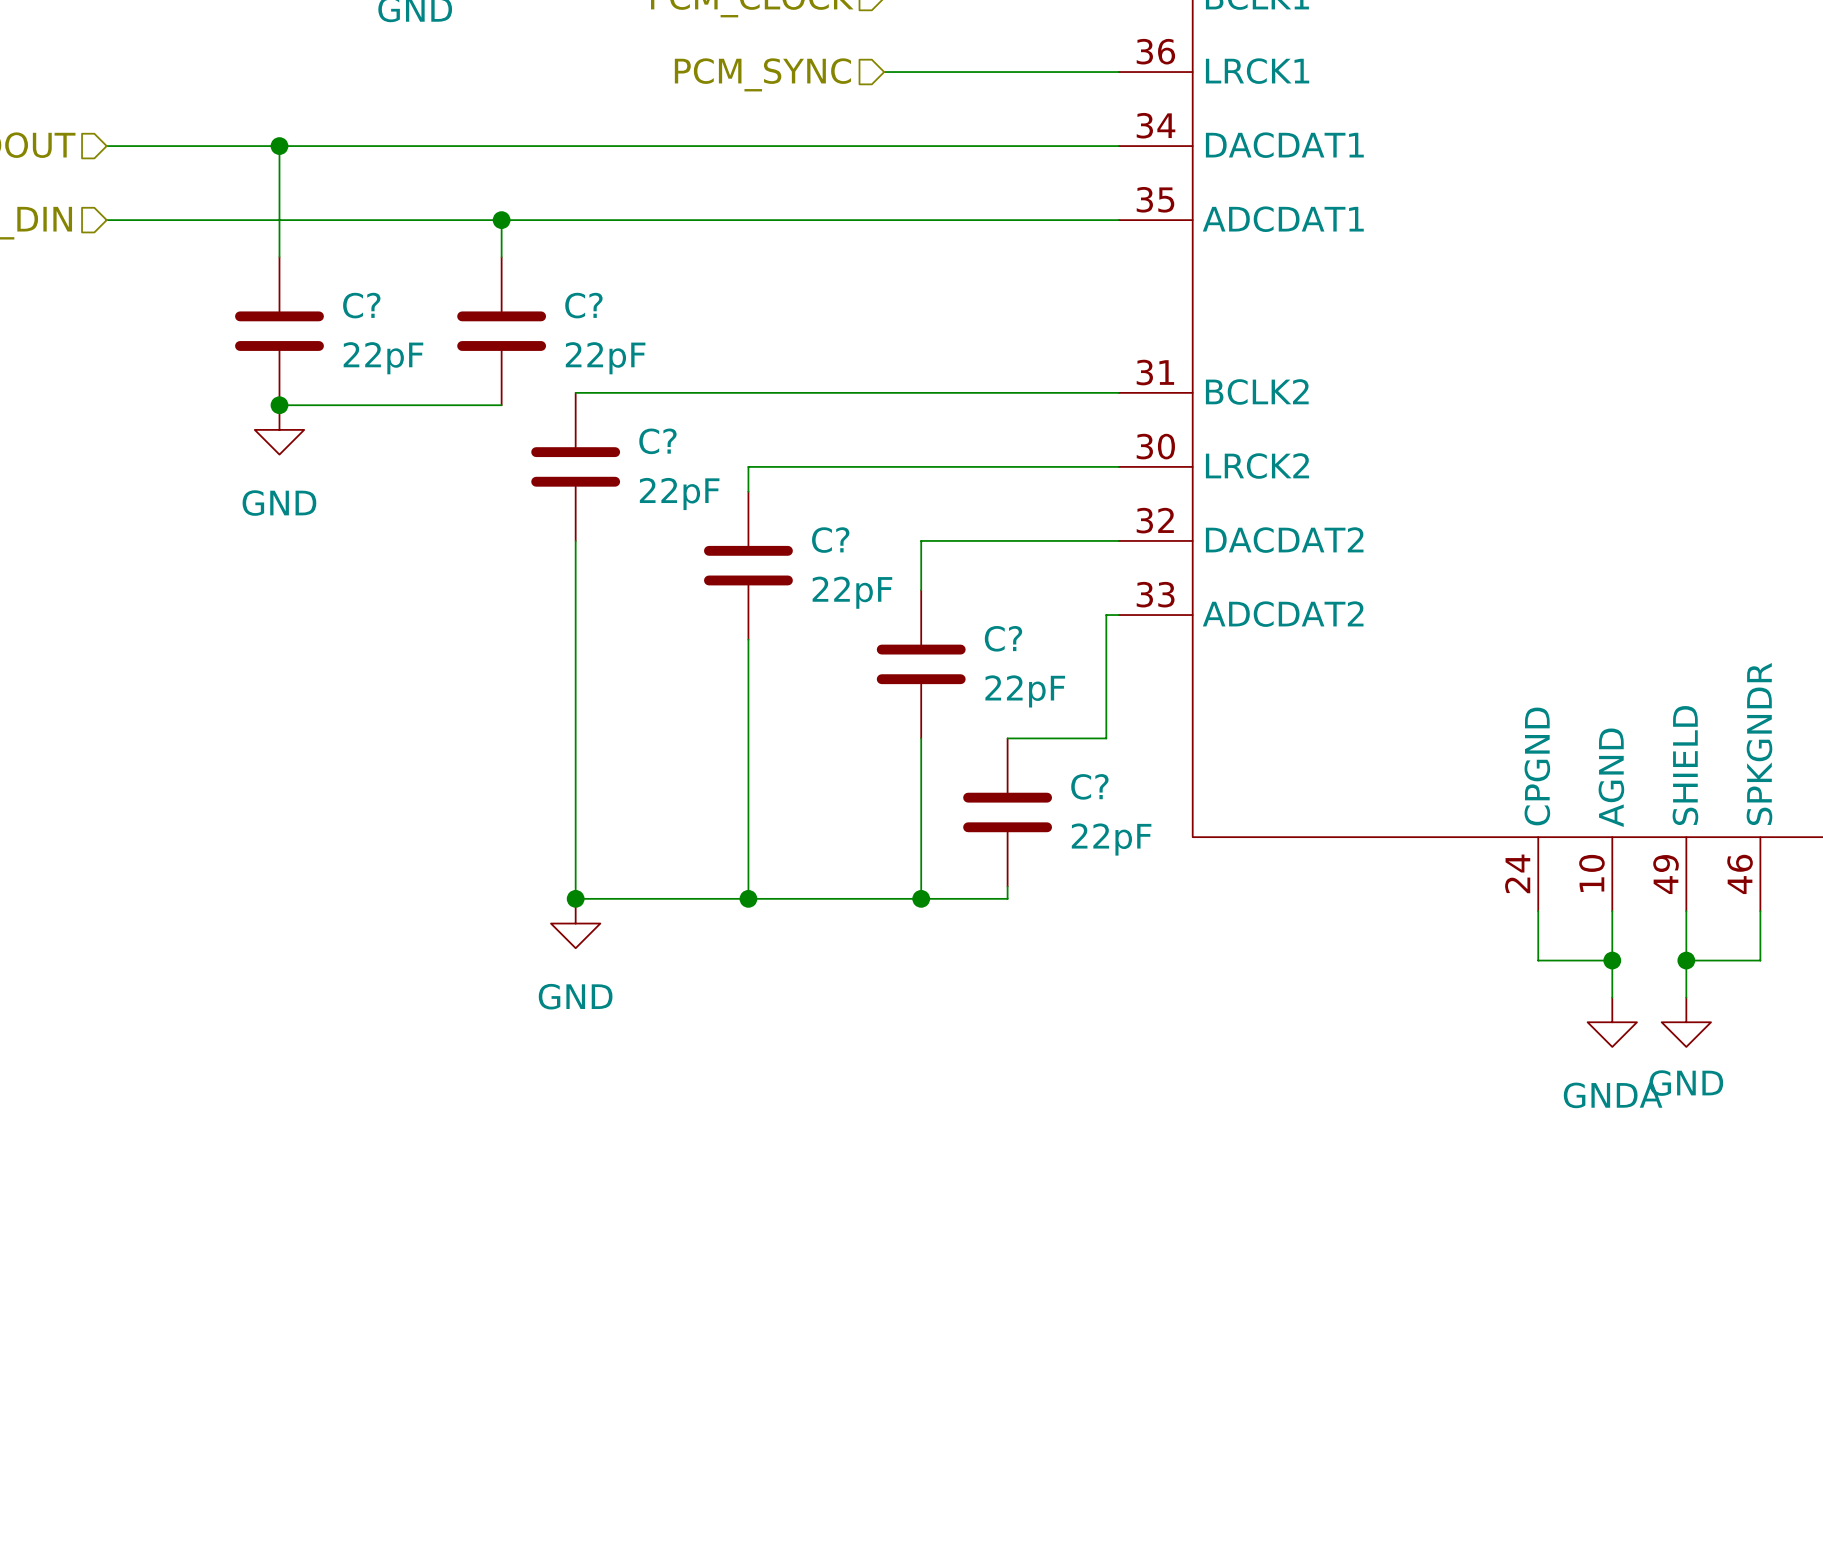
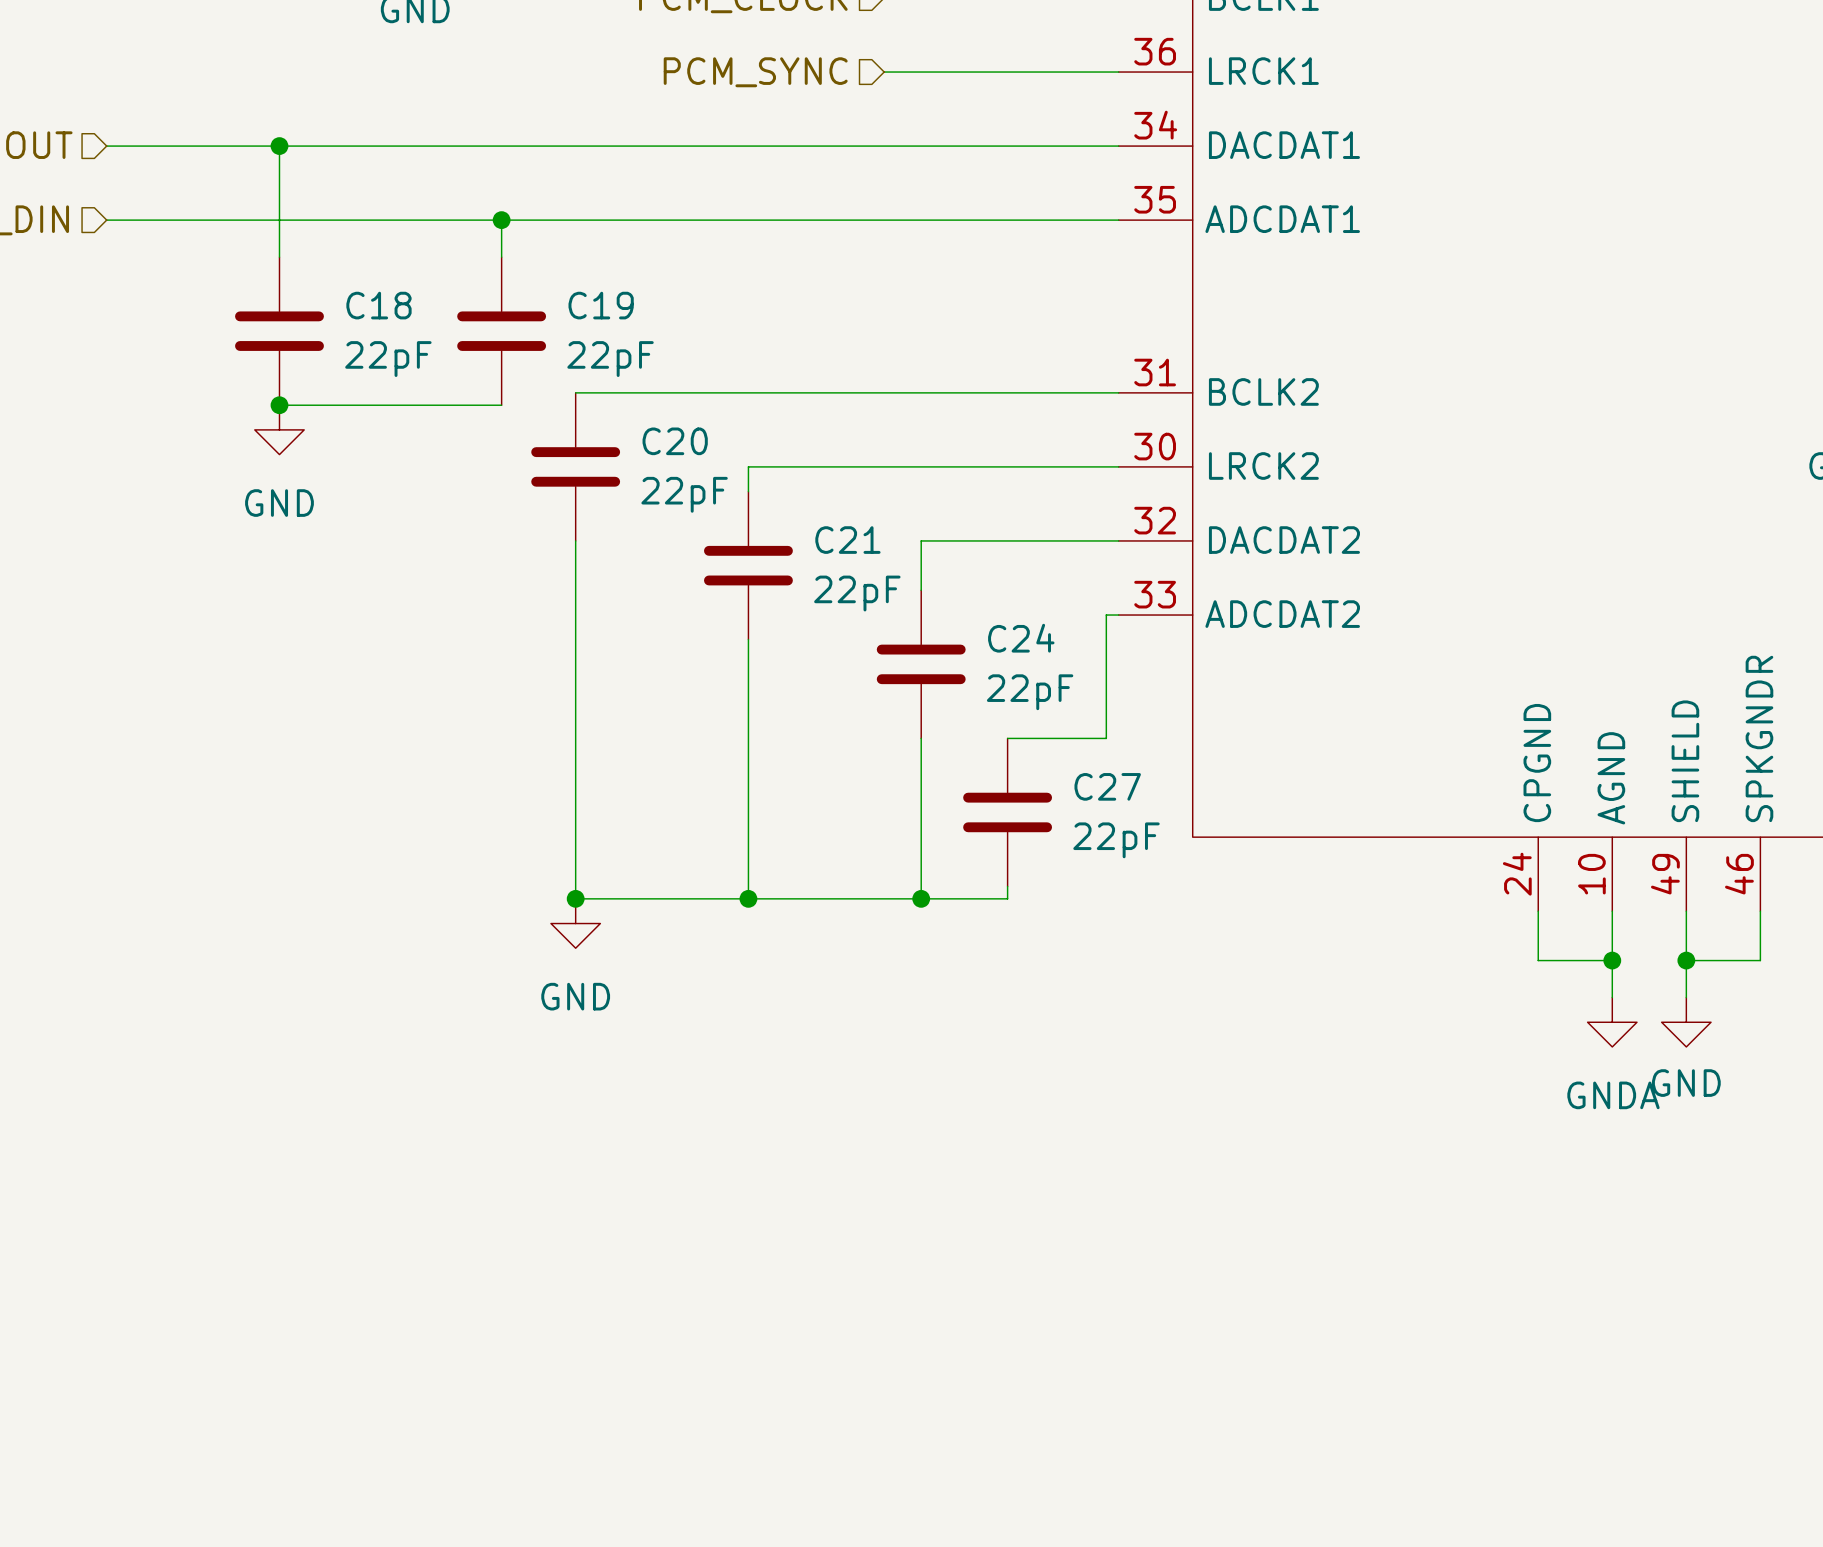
C? name: C? (361, 305) -> C18 (378, 305)
C? name: C? (583, 305) -> C19 (601, 305)
C? name: C? (657, 441) -> C20 (675, 441)
C? name: C? (830, 540) -> C21 (847, 540)
C? name: C? (1003, 638) -> C24 (1021, 638)
C? name: C? (1089, 786) -> C27 (1107, 786)

